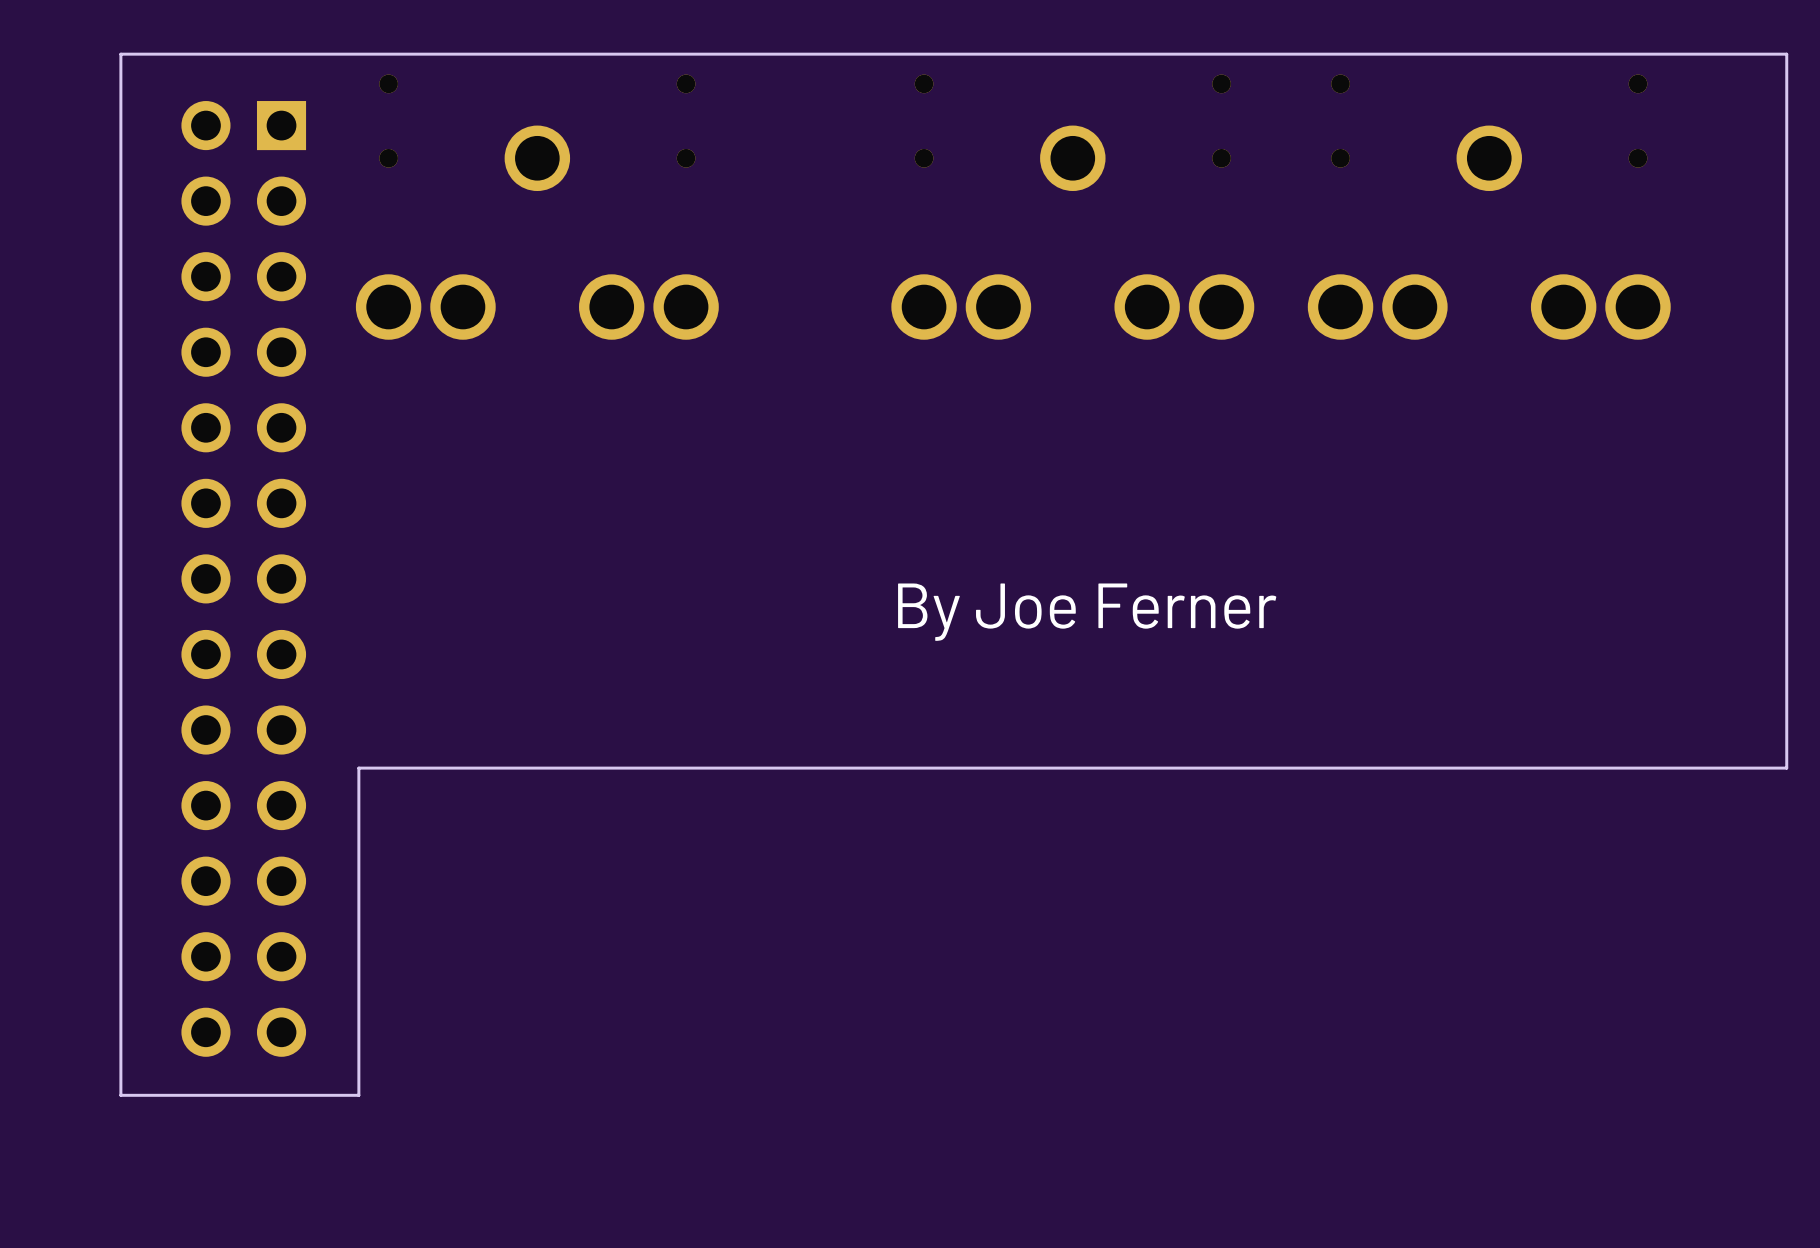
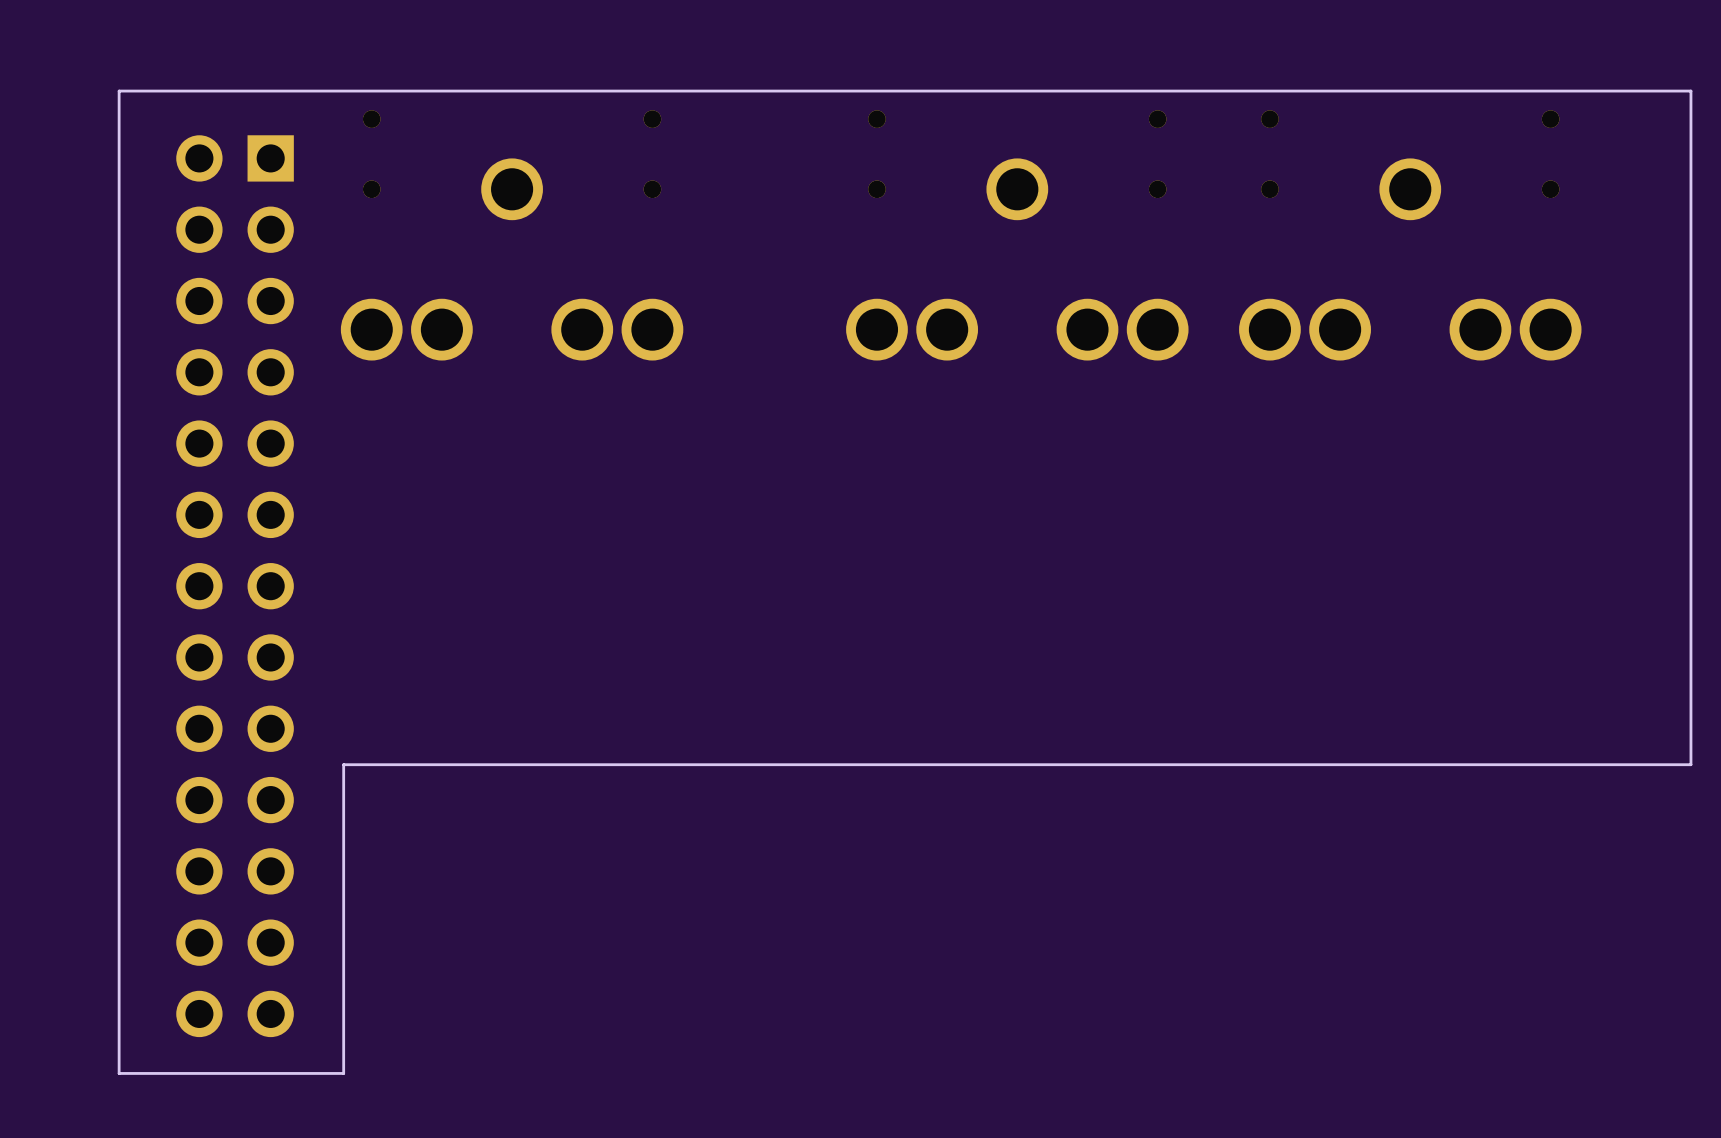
text: By Joe Ferner (1087, 612) -> none

